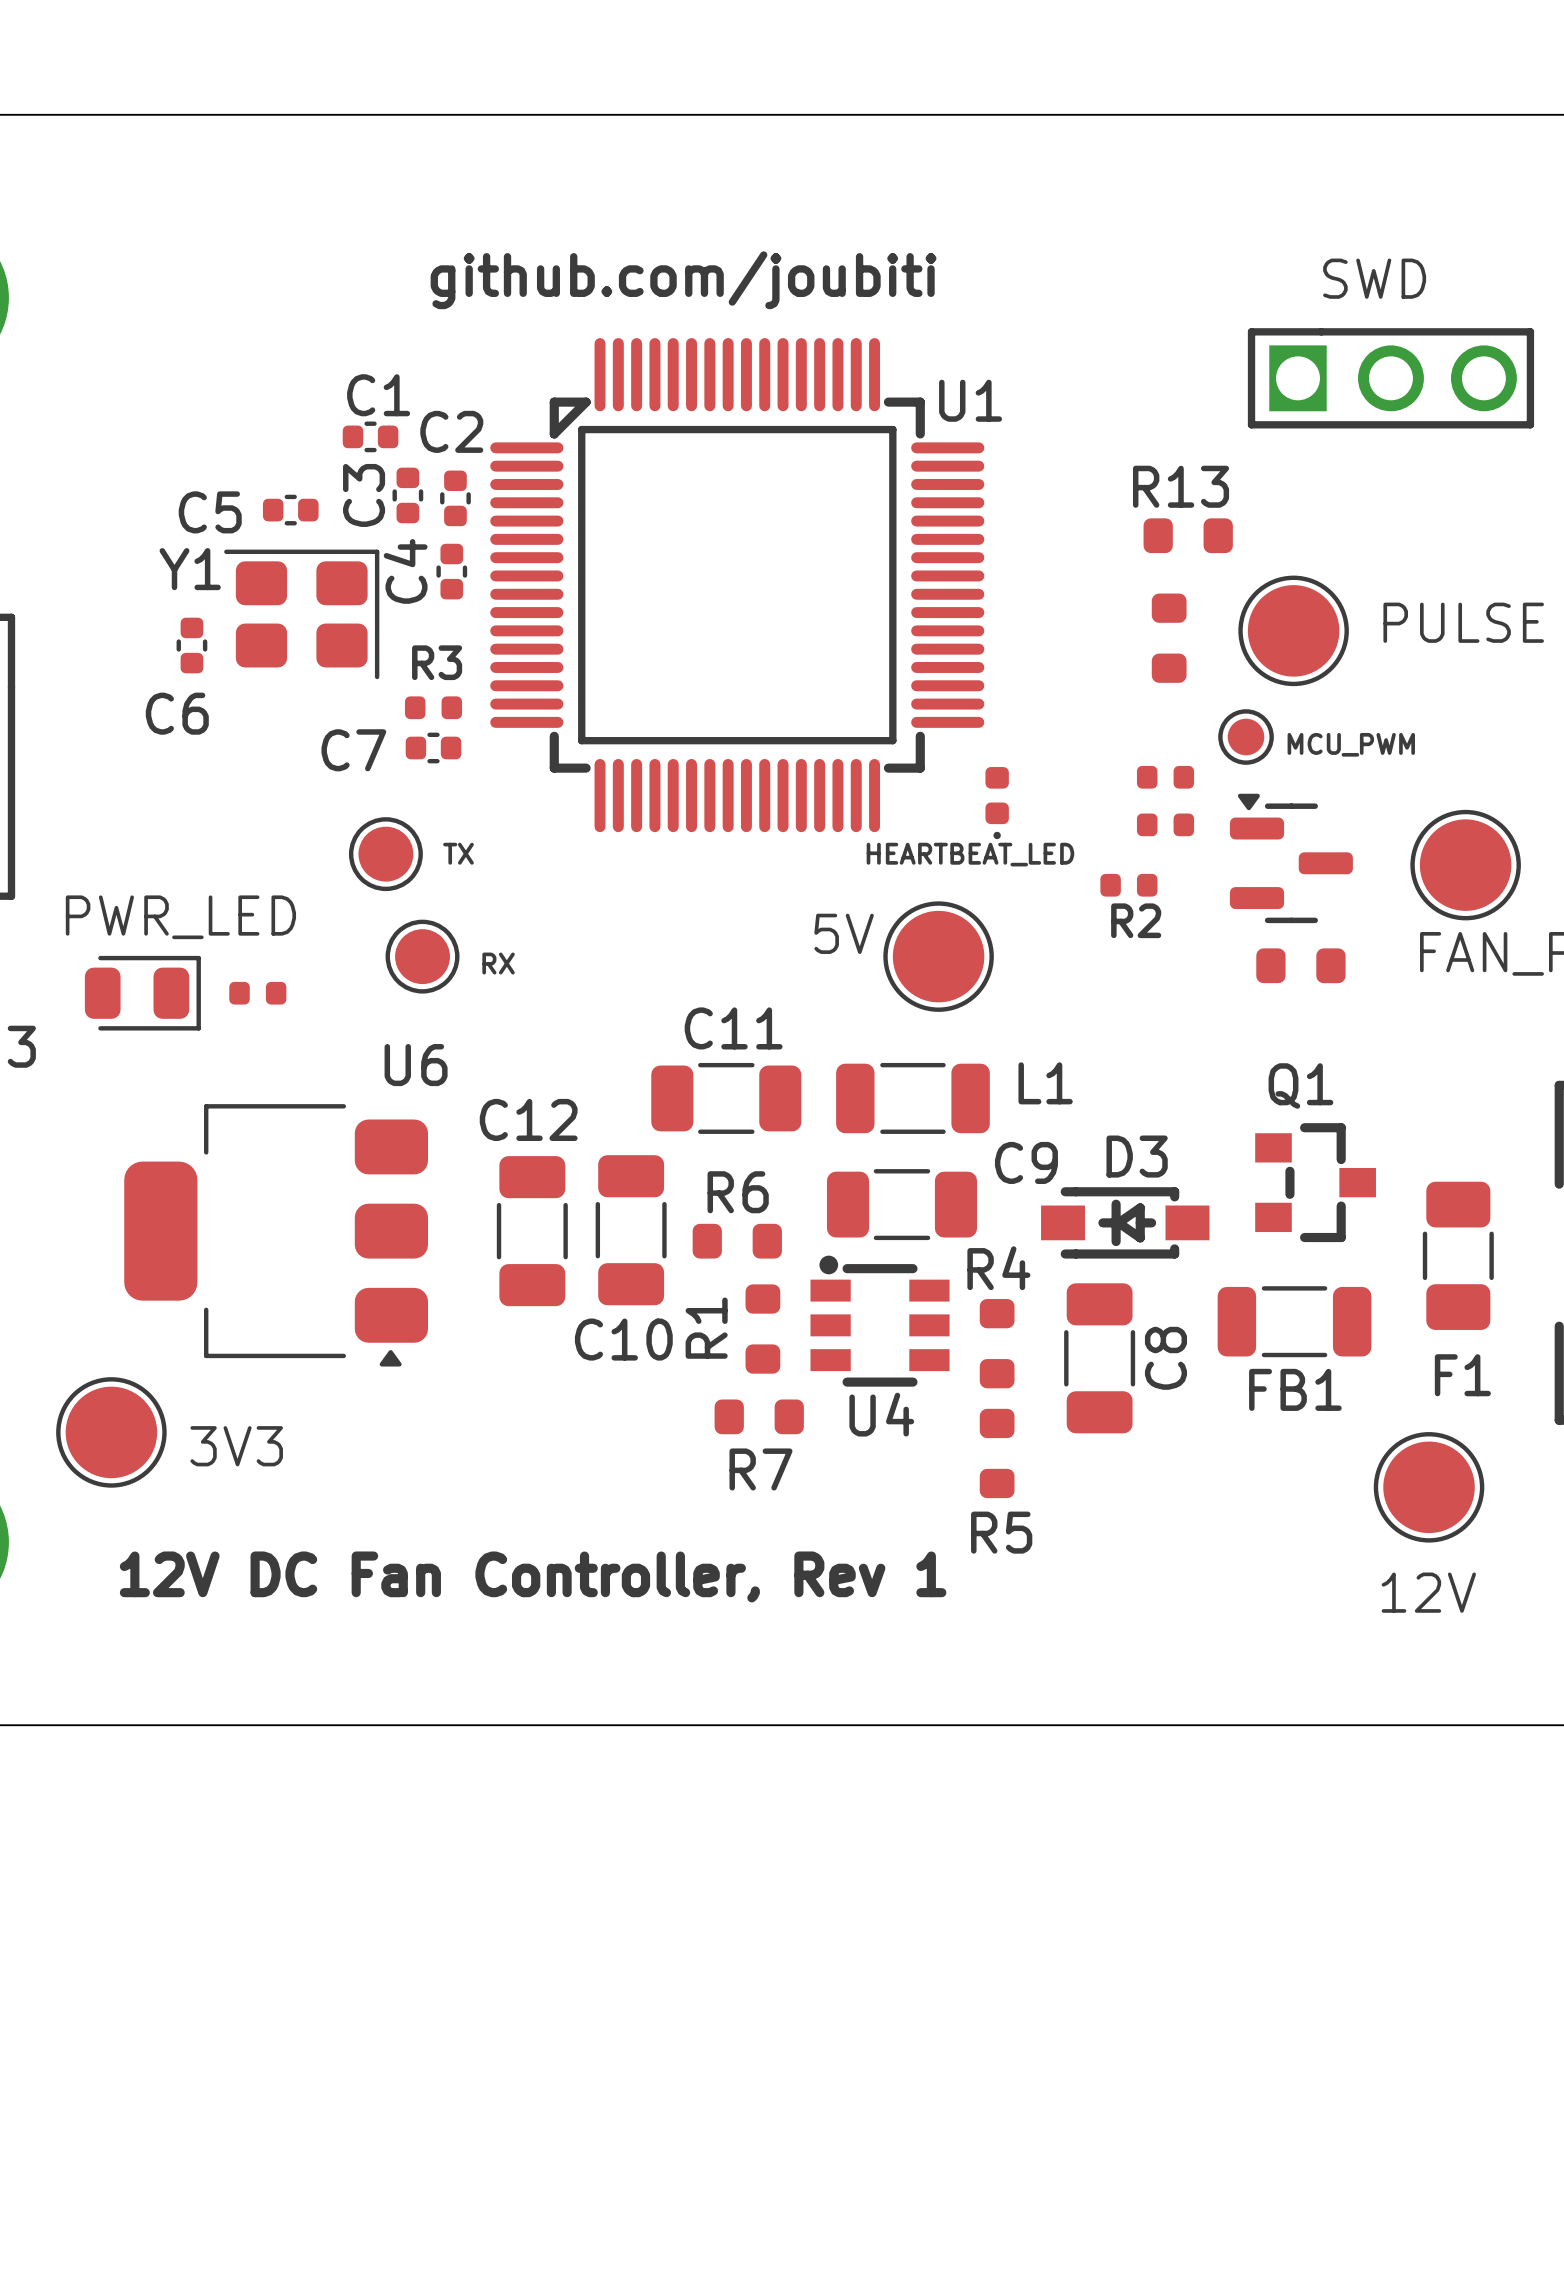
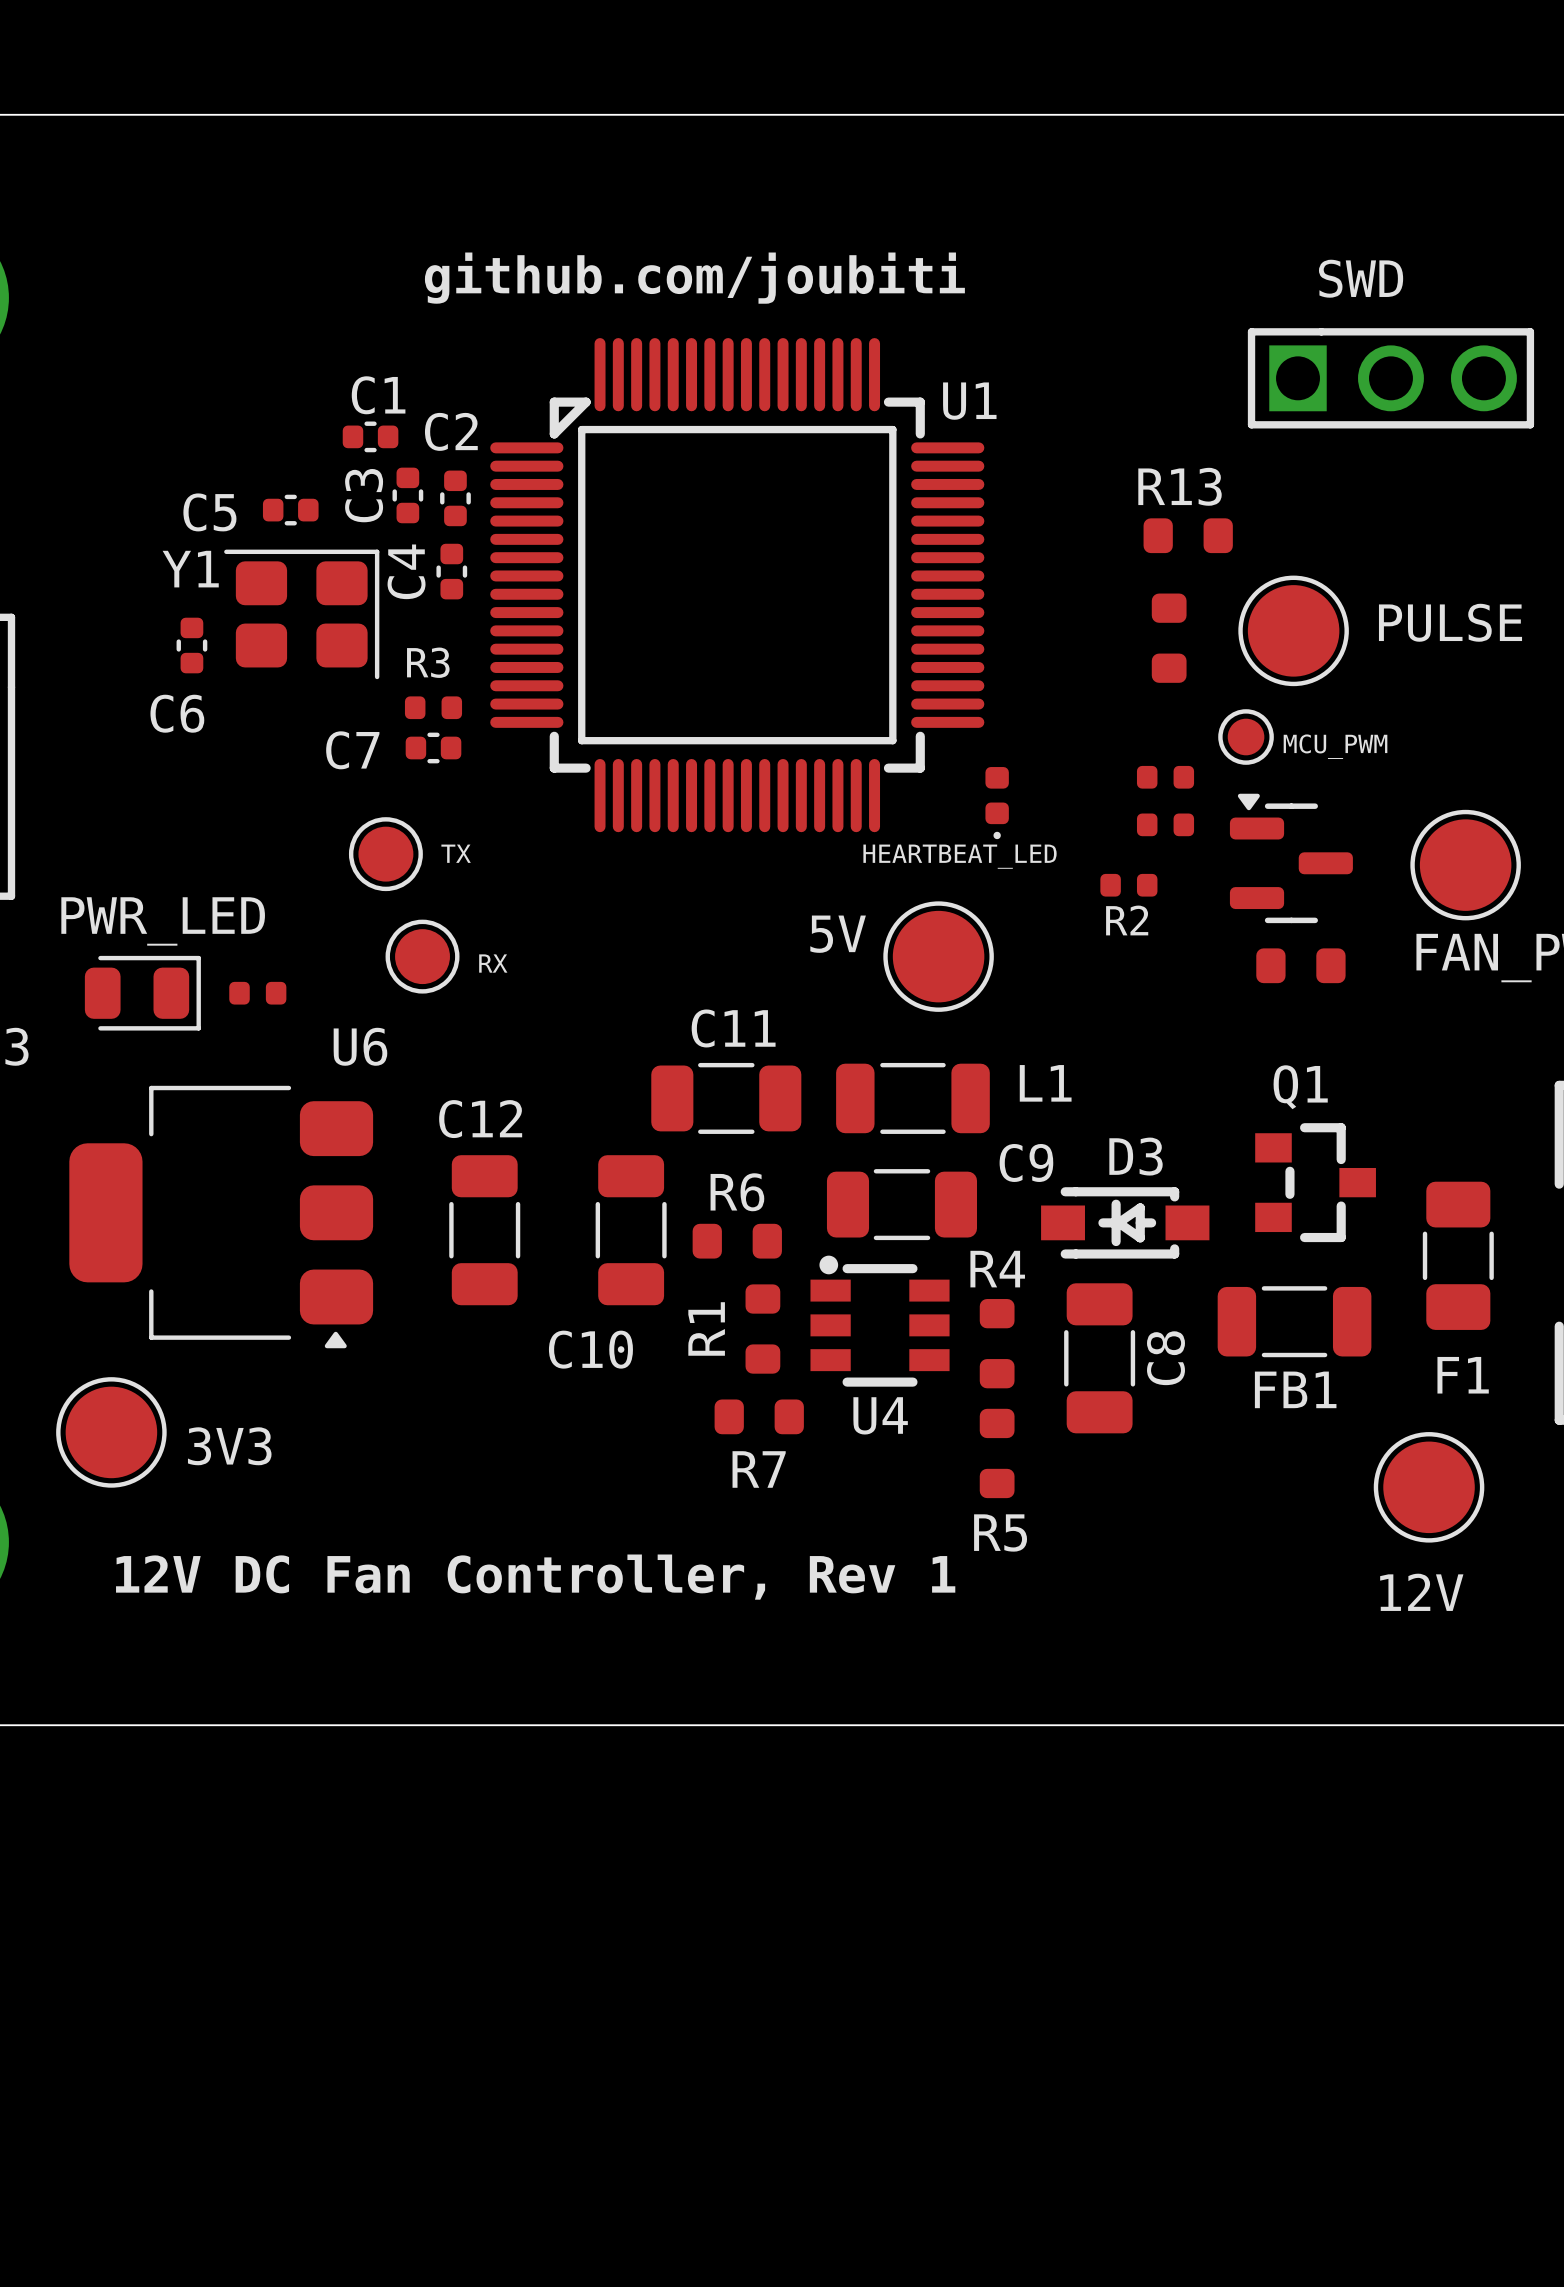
C12 position: (532, 1231) -> (484, 1230)
U6 position: (276, 1235) -> (221, 1217)
C10 name position: C10 (623, 1339) -> C10 (590, 1349)

